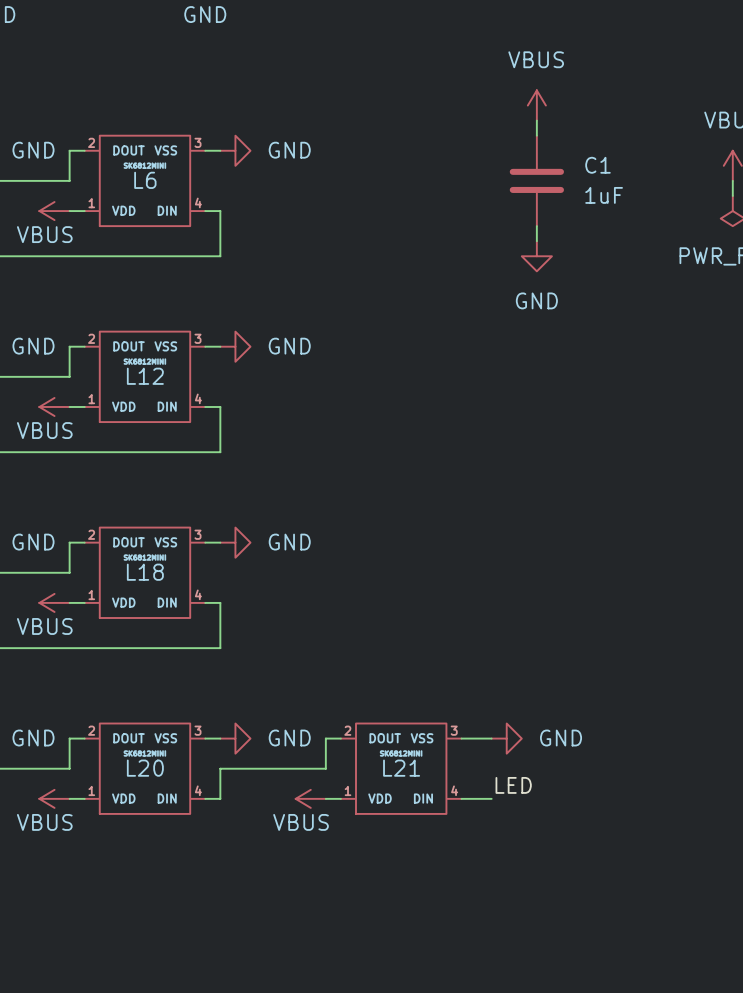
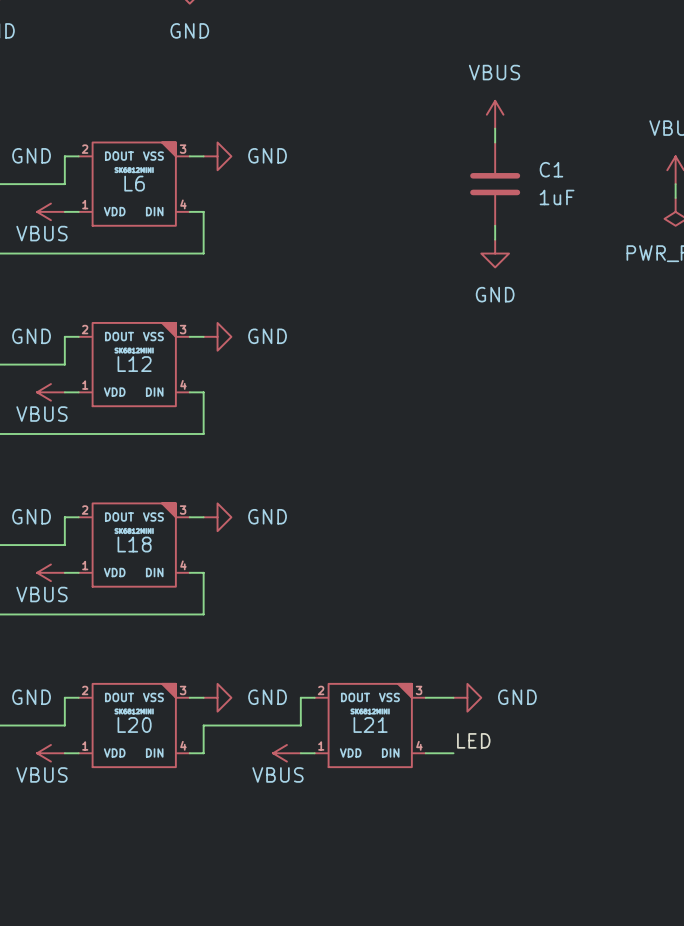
L6 symbol: [84, 135, 206, 227] -> [78, 142, 190, 226]
L12 symbol: [84, 331, 206, 423] -> [78, 322, 190, 407]
L18 symbol: [84, 527, 206, 619] -> [78, 503, 190, 587]
L20 symbol: [84, 723, 206, 814] -> [78, 683, 190, 768]
L21 symbol: [340, 723, 462, 814] -> [314, 683, 426, 768]

